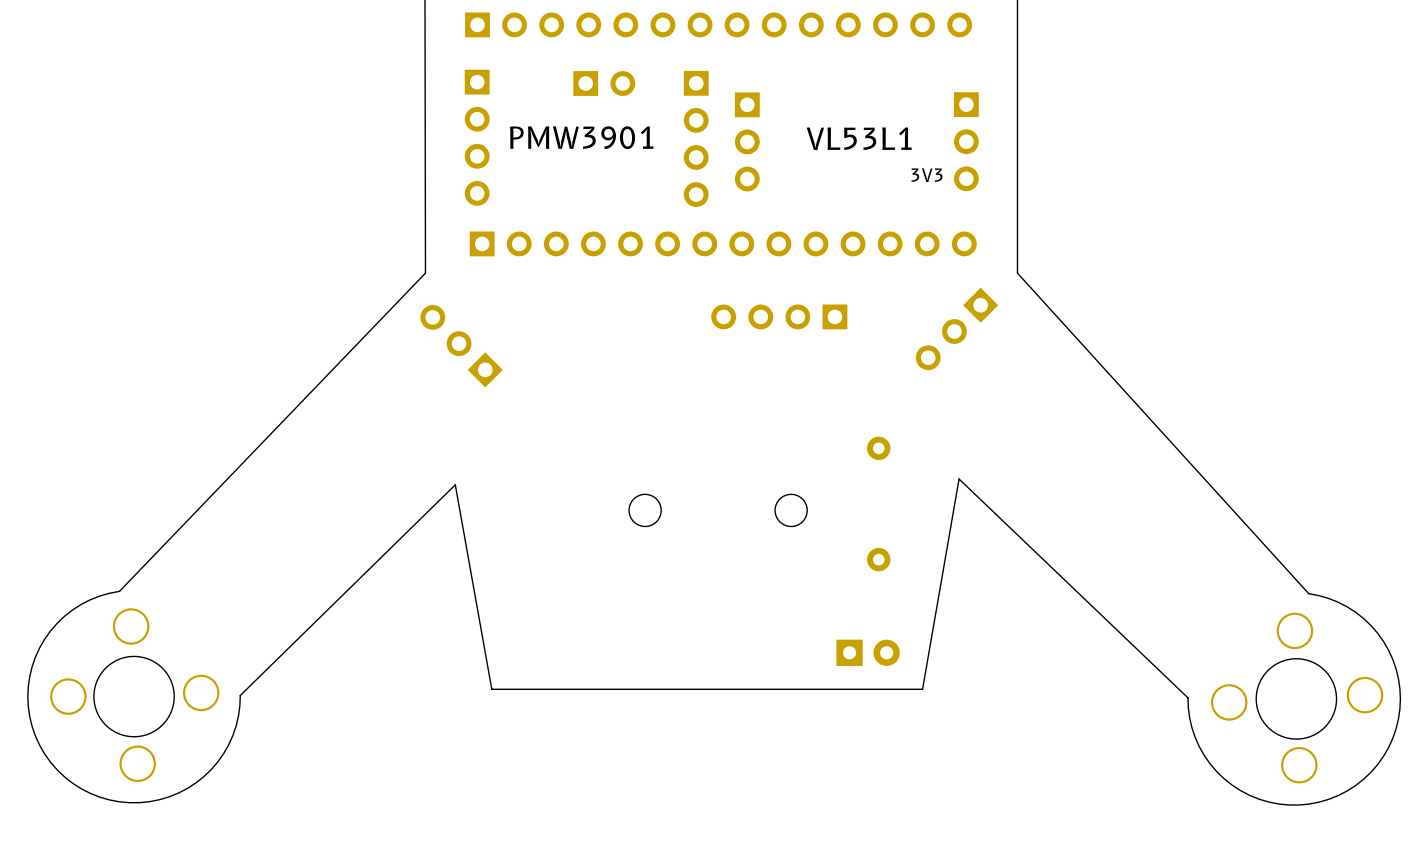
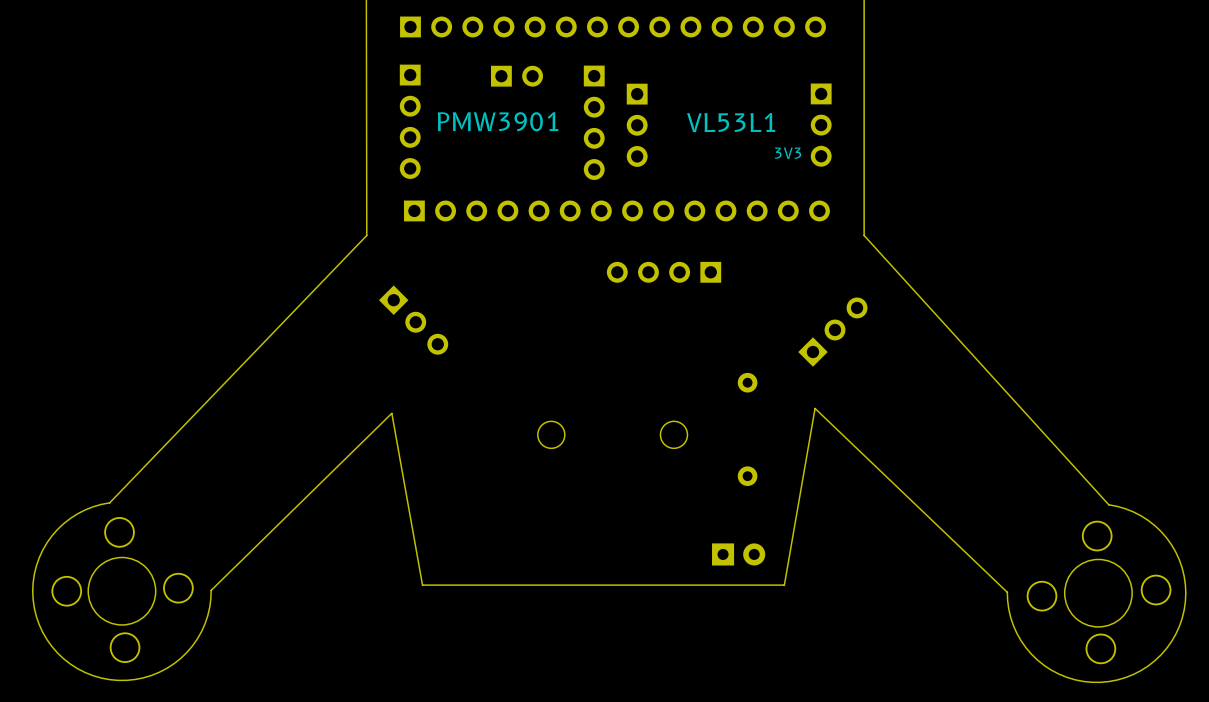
part rotation: 0° (957, 328) -> 180° (832, 332)
part position: (957, 328) -> (832, 332)
part rotation: 0° (461, 346) -> 180° (413, 320)

